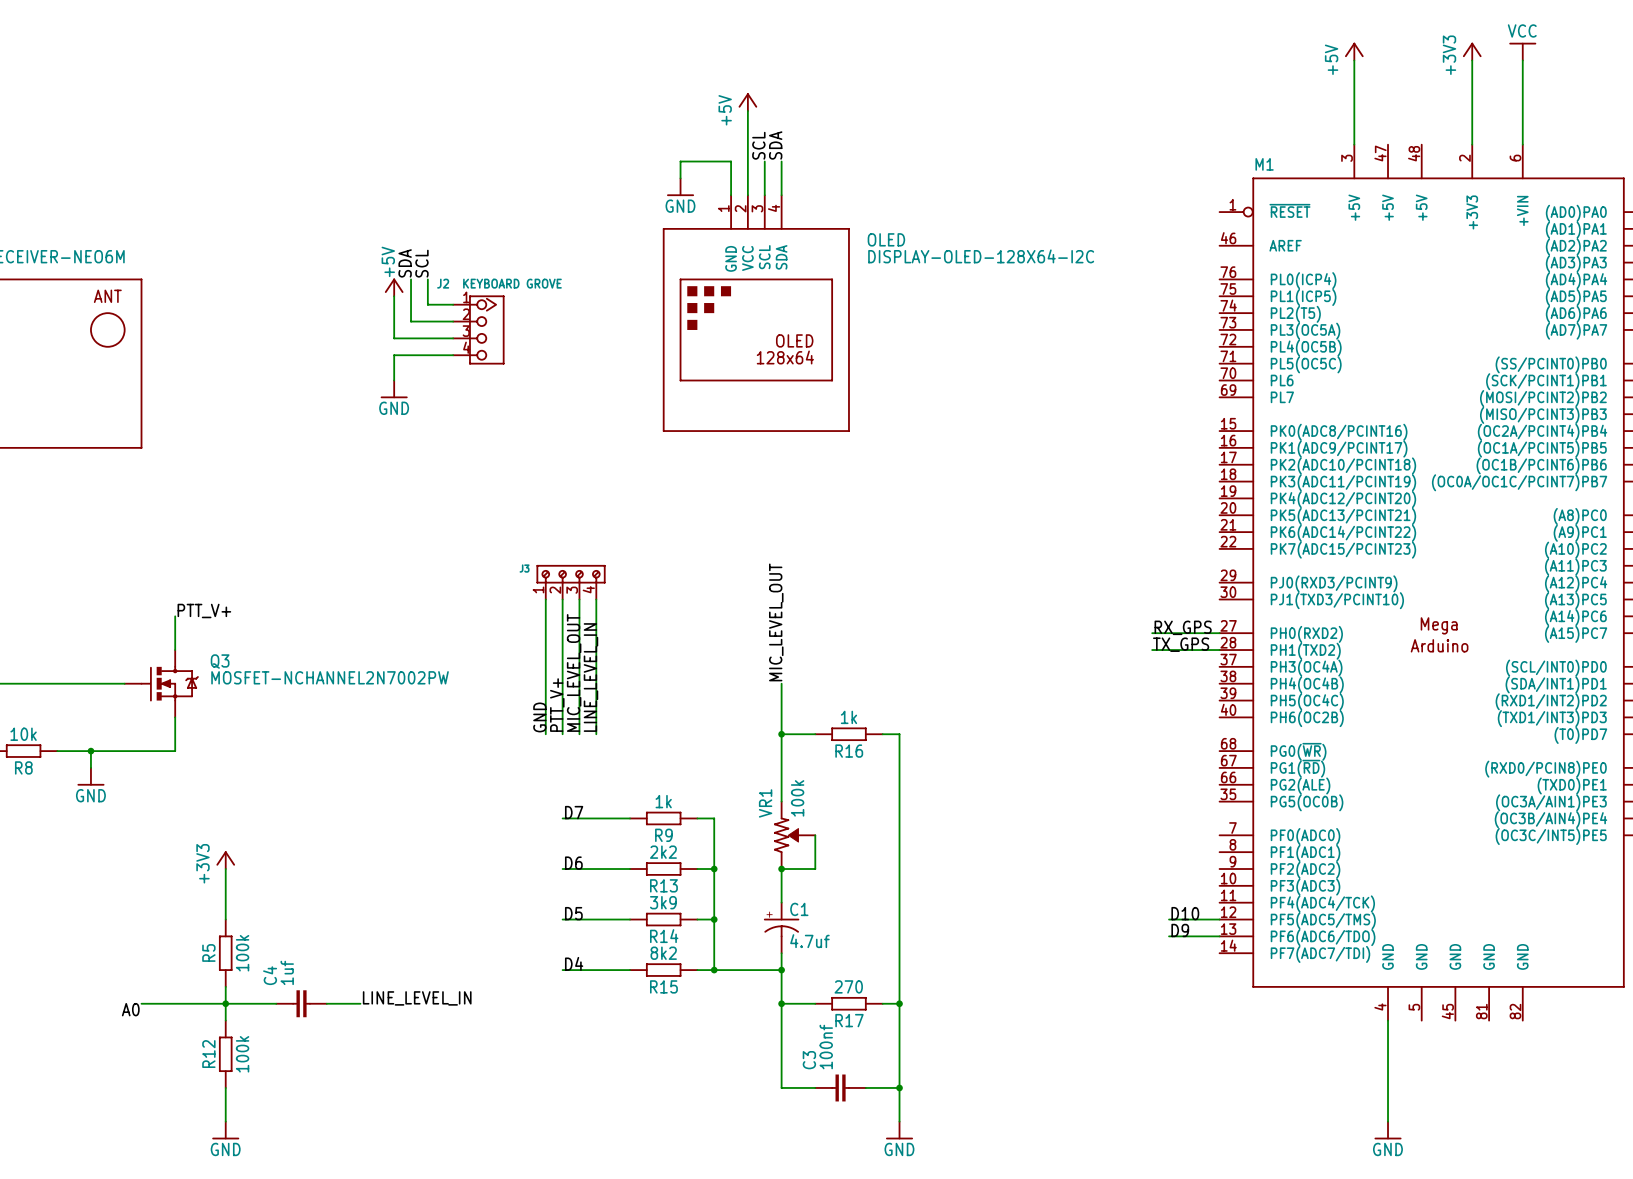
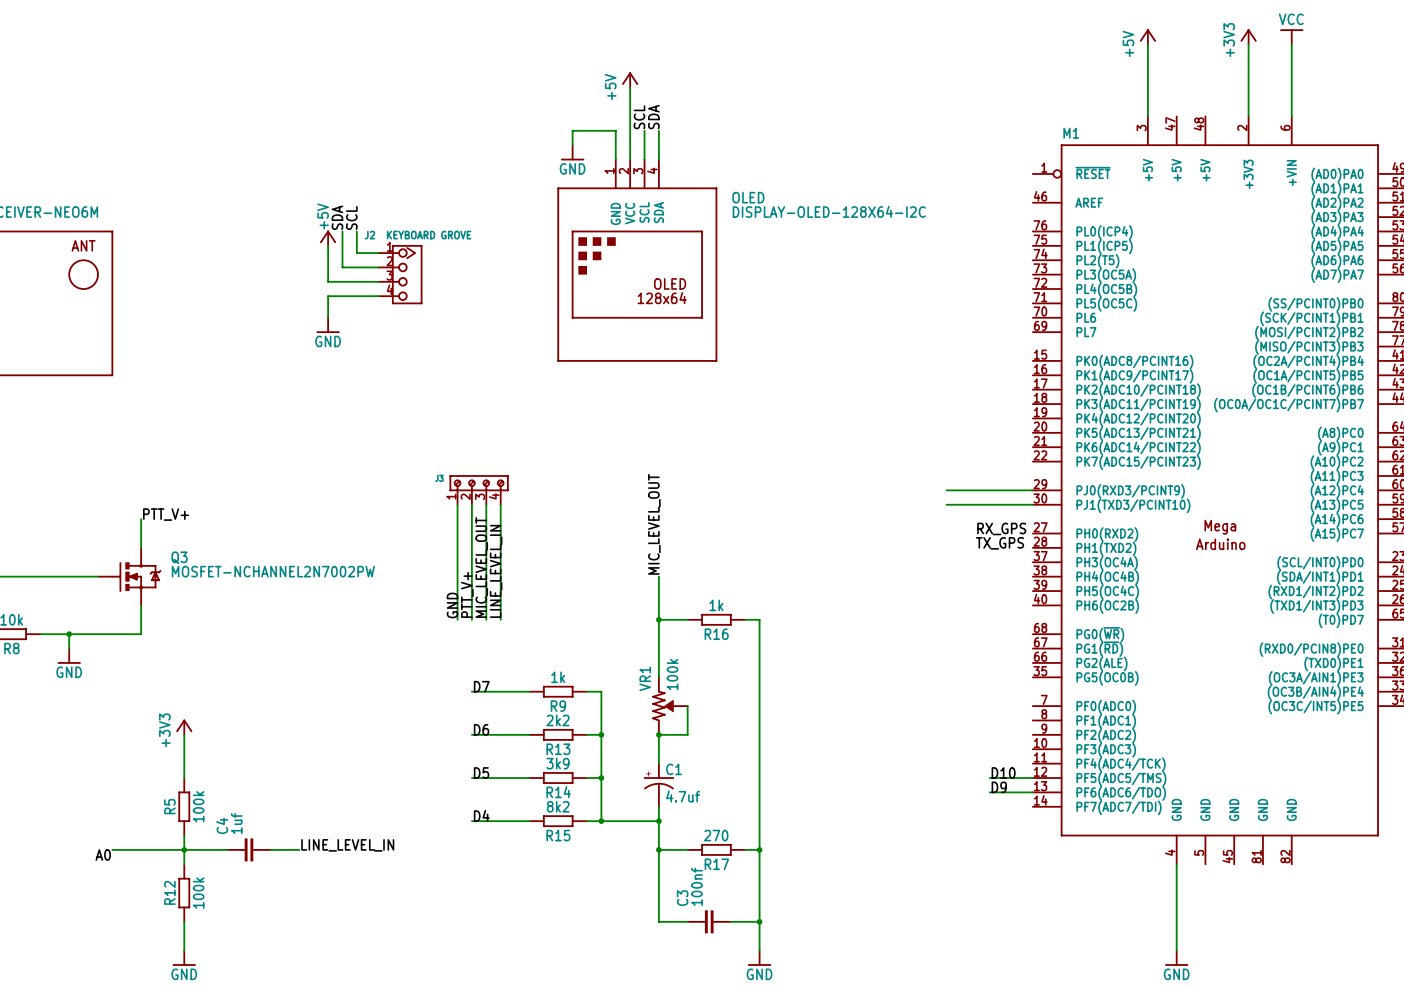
wire: none -> (946, 490) (1032, 490)
wire: none -> (946, 504) (1032, 504)
wire: (1152, 633) (1219, 633) -> none
wire: (1152, 650) (1219, 650) -> none

